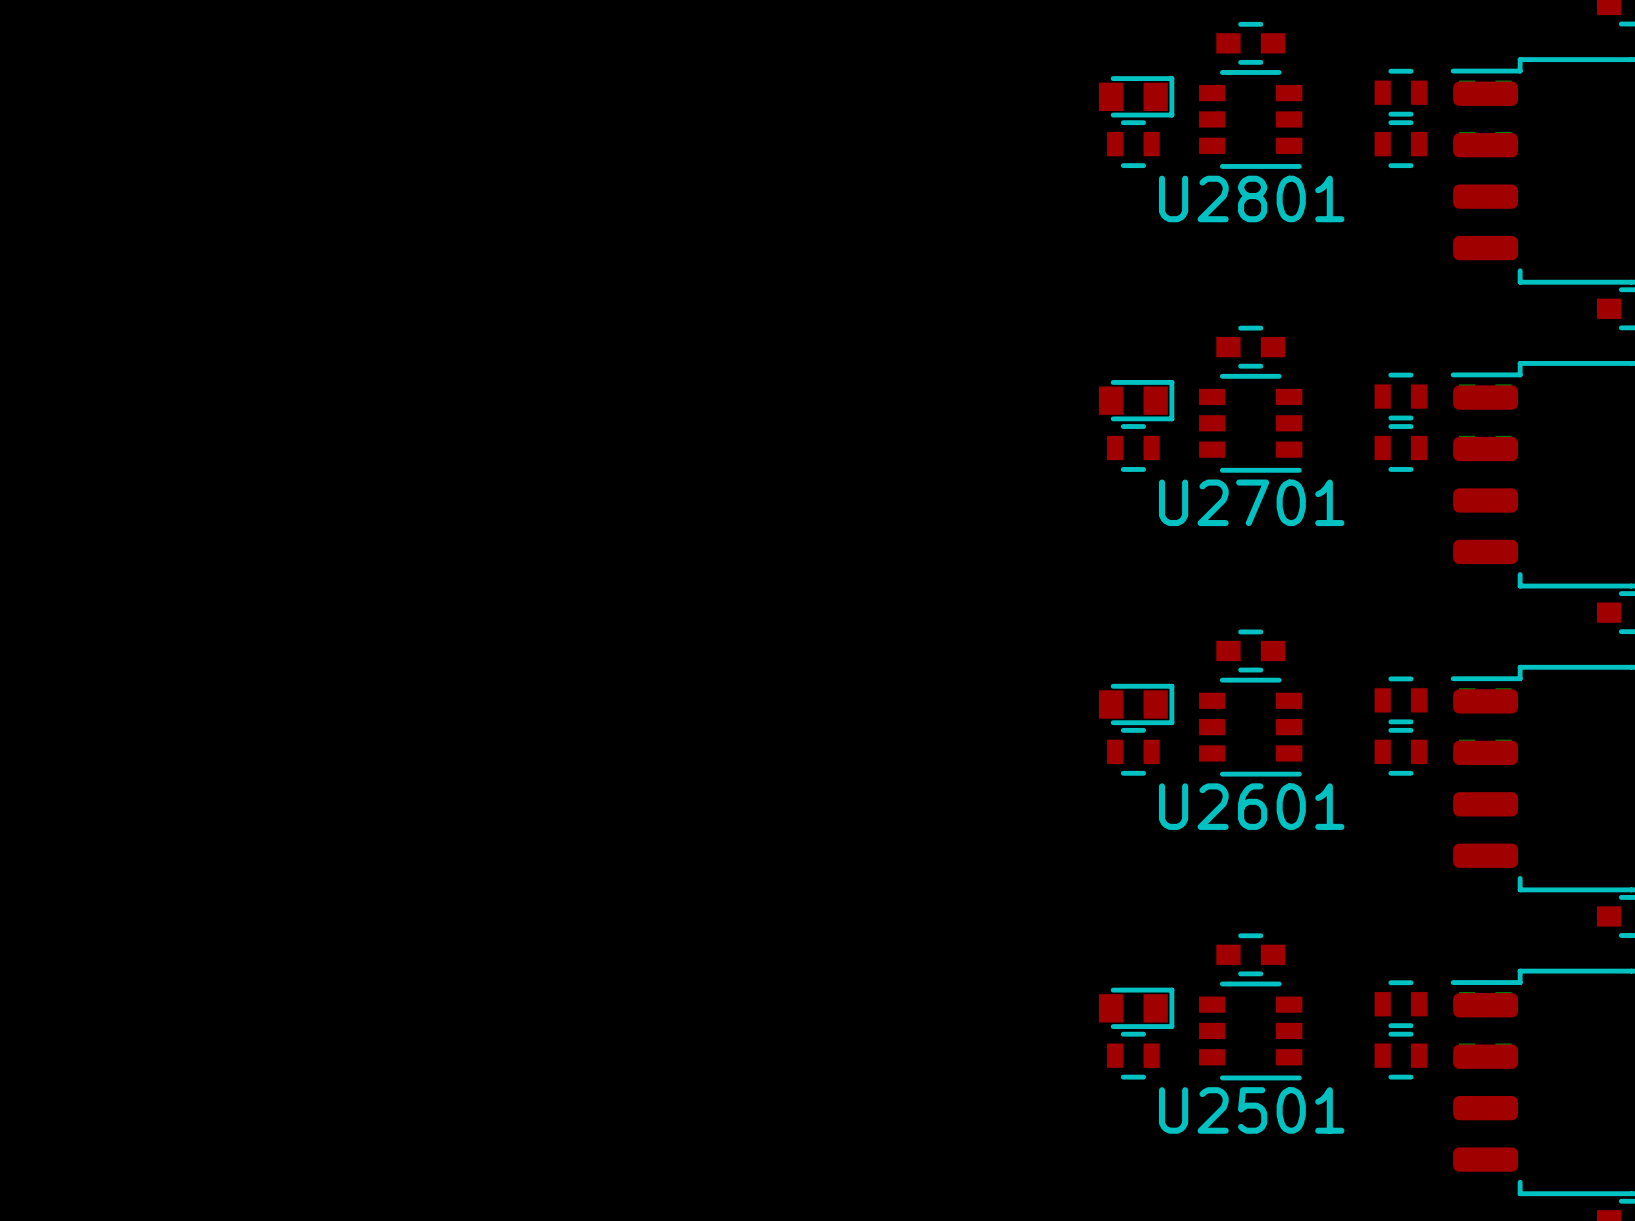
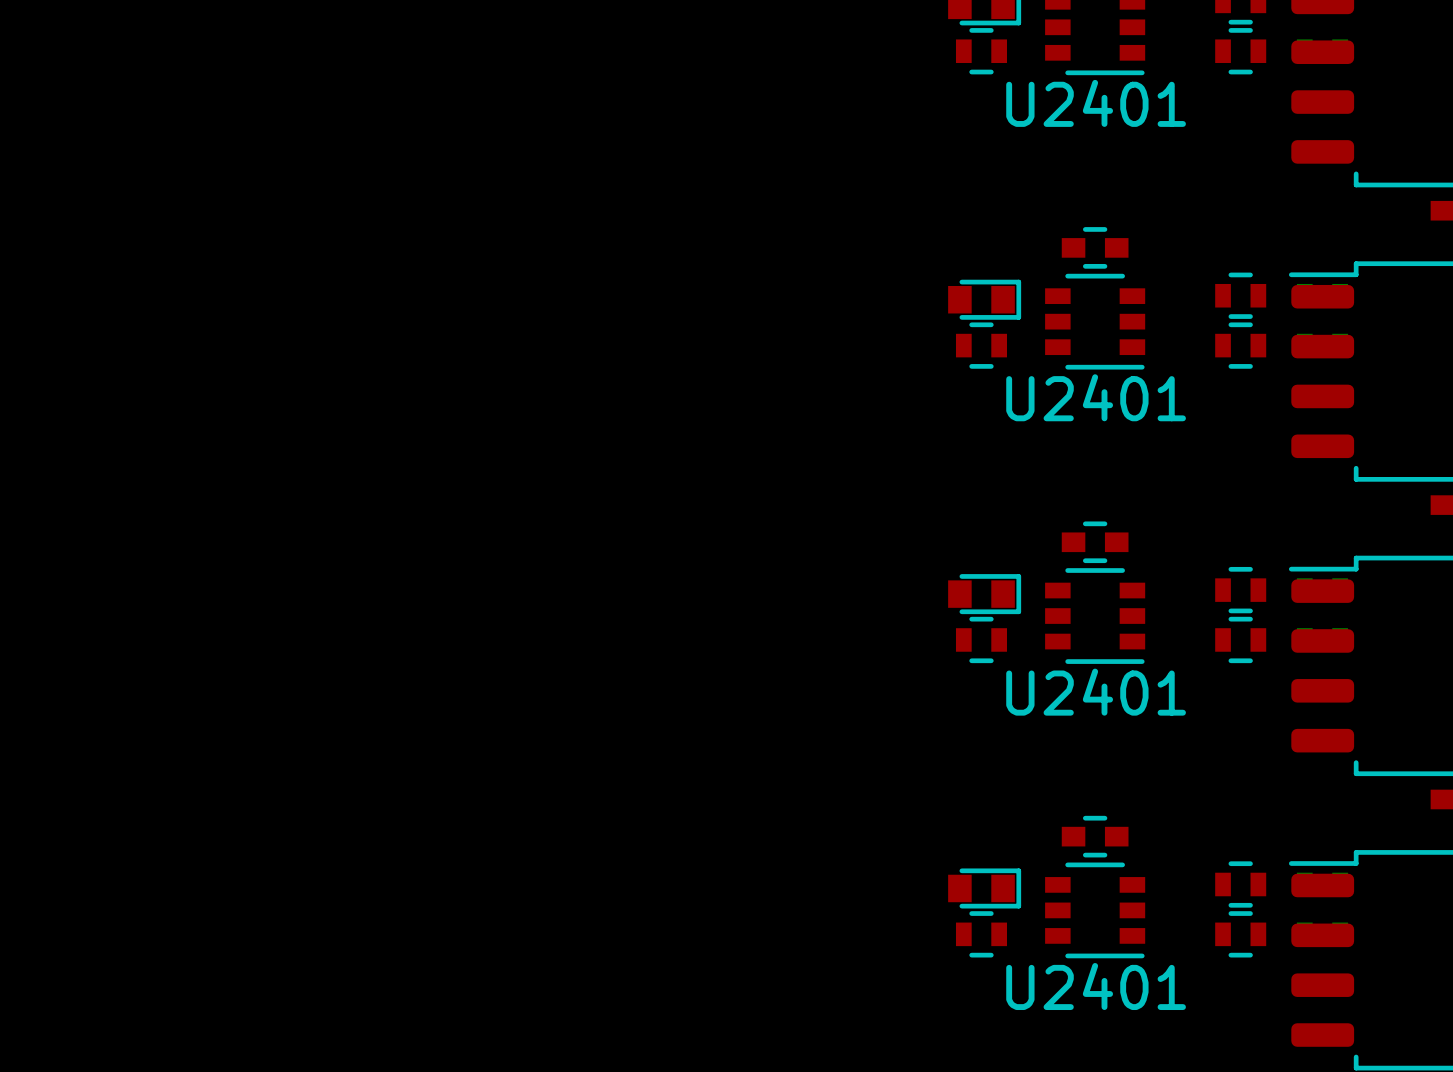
U2801 name: U2801 (1251, 198) -> U2401 (1096, 103)
U2701 name: U2701 (1251, 502) -> U2401 (1096, 397)
U2601 name: U2601 (1251, 806) -> U2401 (1096, 692)
U2501 name: U2501 (1251, 1110) -> U2401 (1096, 986)

